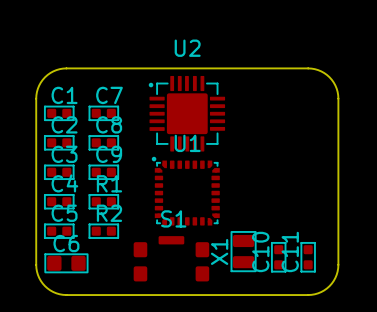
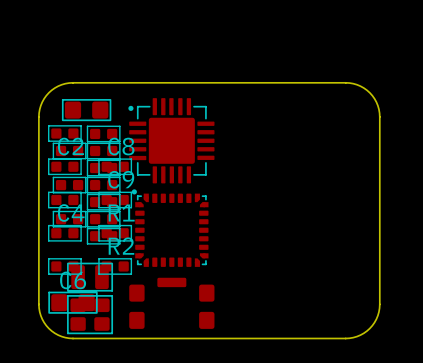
part: none -> (86, 110)
C1 name: C1 (64, 95) -> none
part: none -> (103, 133)
C7: (103, 113) -> none
U2: (186, 113) -> none
part: none -> (171, 140)
part: none -> (69, 151)
part: none -> (103, 151)
part: none -> (103, 168)
C3 name: C3 (64, 154) -> none
part: none -> (69, 185)
part: none -> (103, 185)
part: none -> (103, 202)
part: none -> (69, 219)
part: none -> (103, 219)
U1: (185, 191) -> none
part: none -> (170, 228)
part: none -> (103, 236)
C5 name: C5 (64, 213) -> none
part: none -> (90, 277)
X1: (243, 251) -> none
C10: (278, 257) -> none
C11: (308, 257) -> none
S1: (171, 258) -> none
part: none -> (171, 303)
part: none -> (90, 314)

